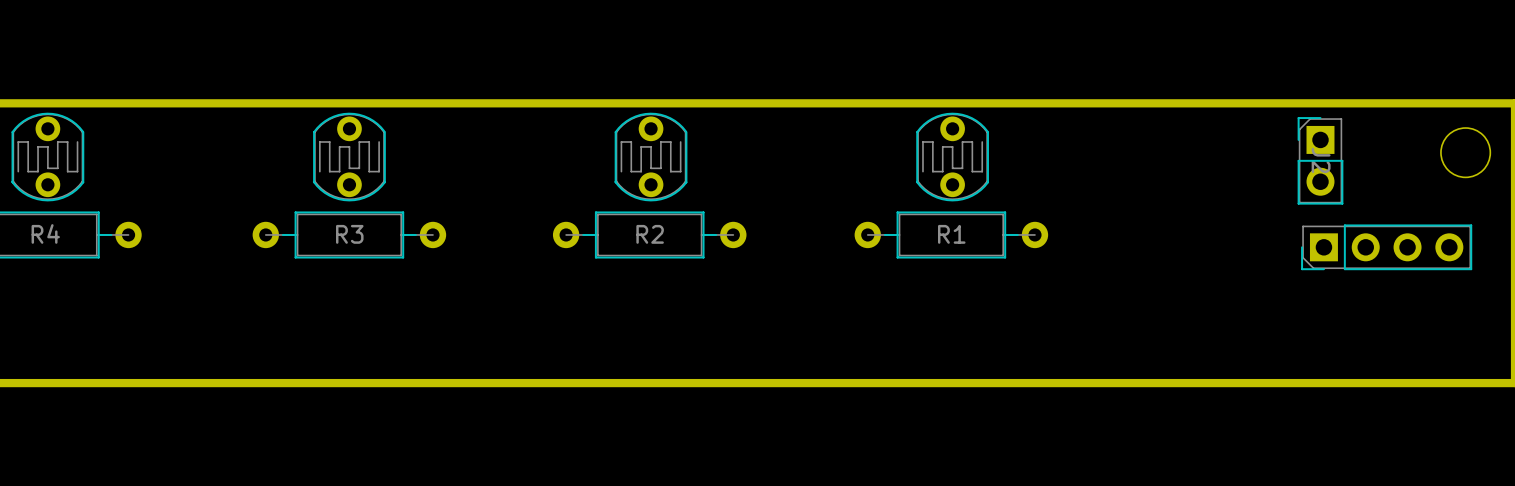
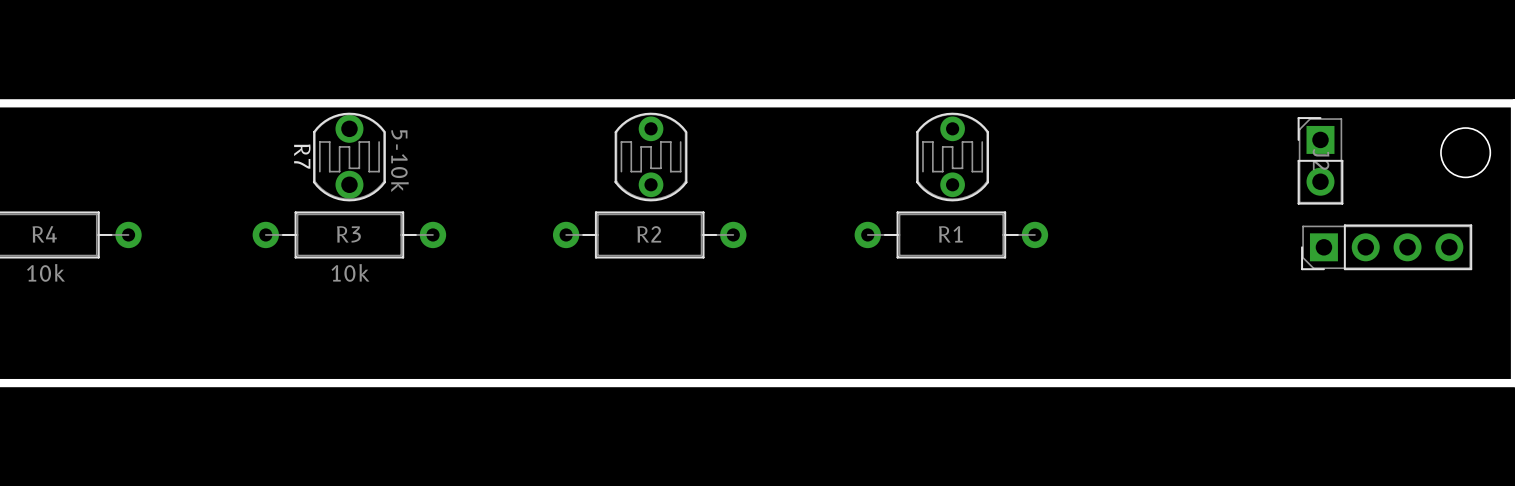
part: (47, 157) -> none
part: (349, 157) -> none
R7: none -> 5-10k (349, 157)
R4 value: none -> 10k (46, 272)
R3 value: none -> 10k (350, 272)

